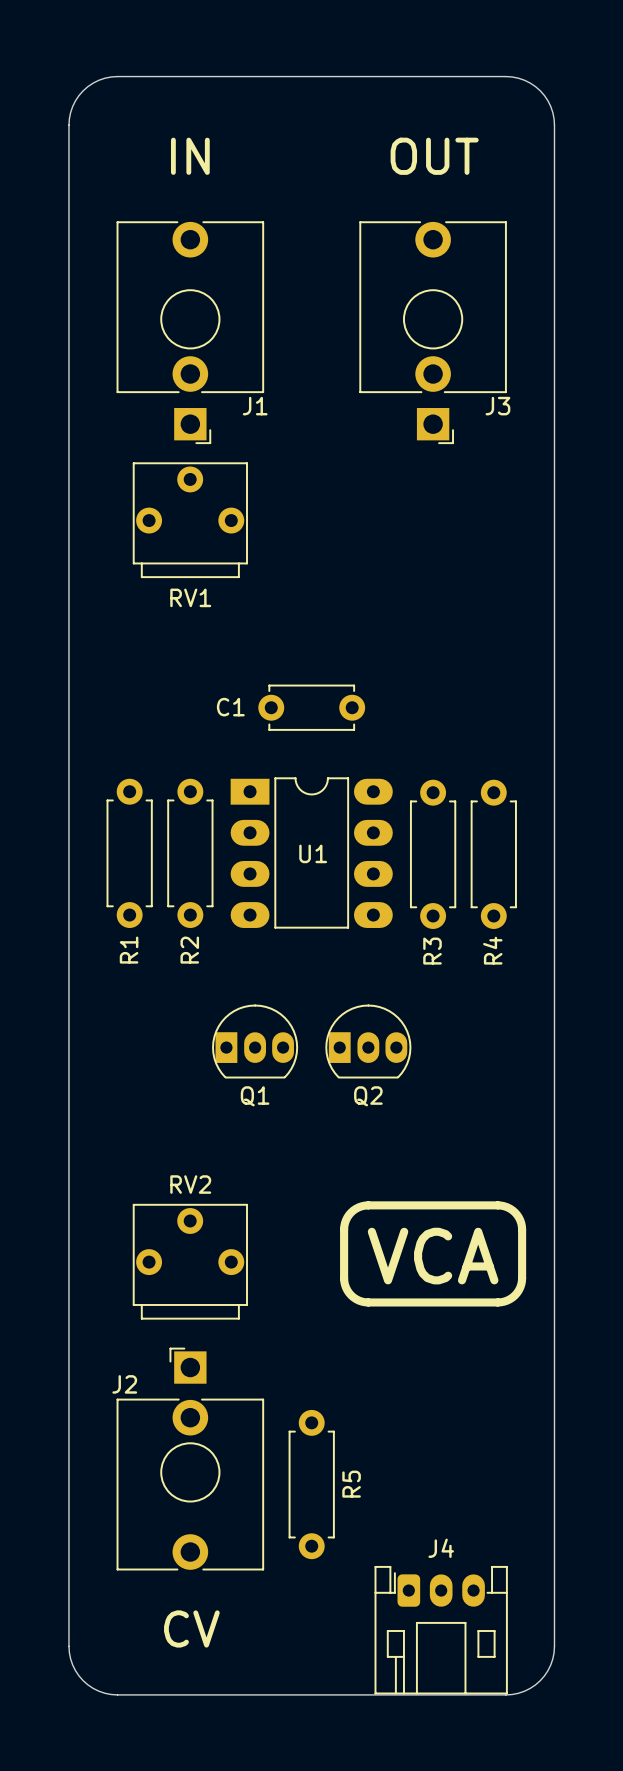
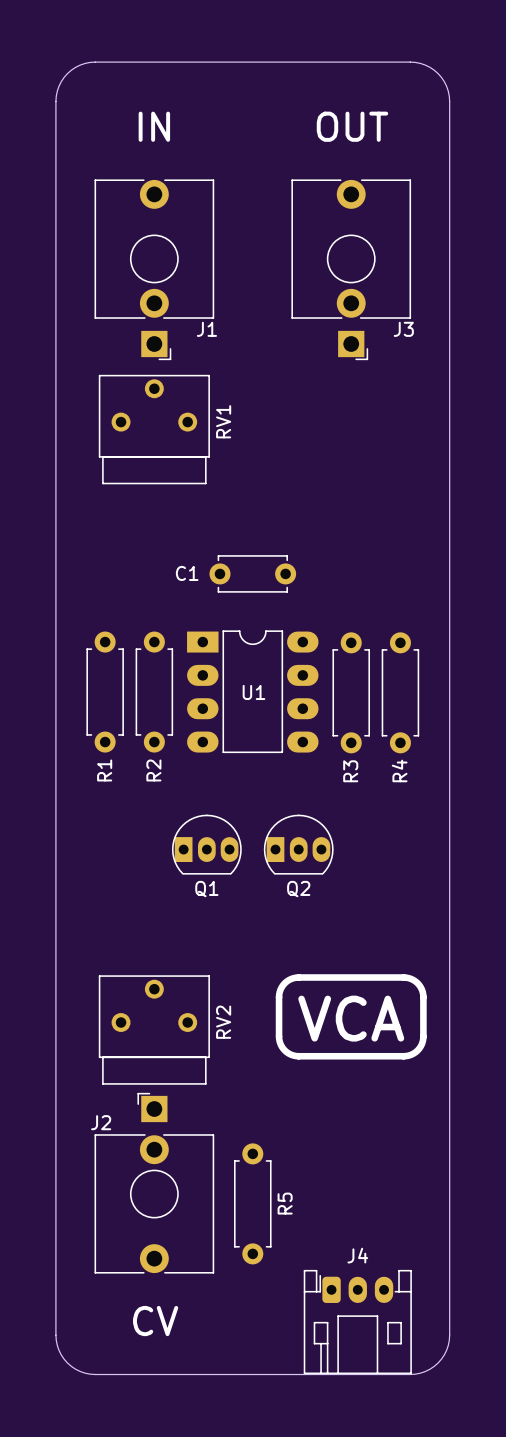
RV1 footprint: [132, 462, 248, 579] -> [98, 374, 210, 485]
RV1 name position: RV1 (190, 597) -> RV1 (223, 421)
RV2 name position: RV2 (190, 1184) -> RV2 (223, 1022)
RV2 footprint: [132, 1203, 248, 1320] -> [98, 975, 210, 1085]

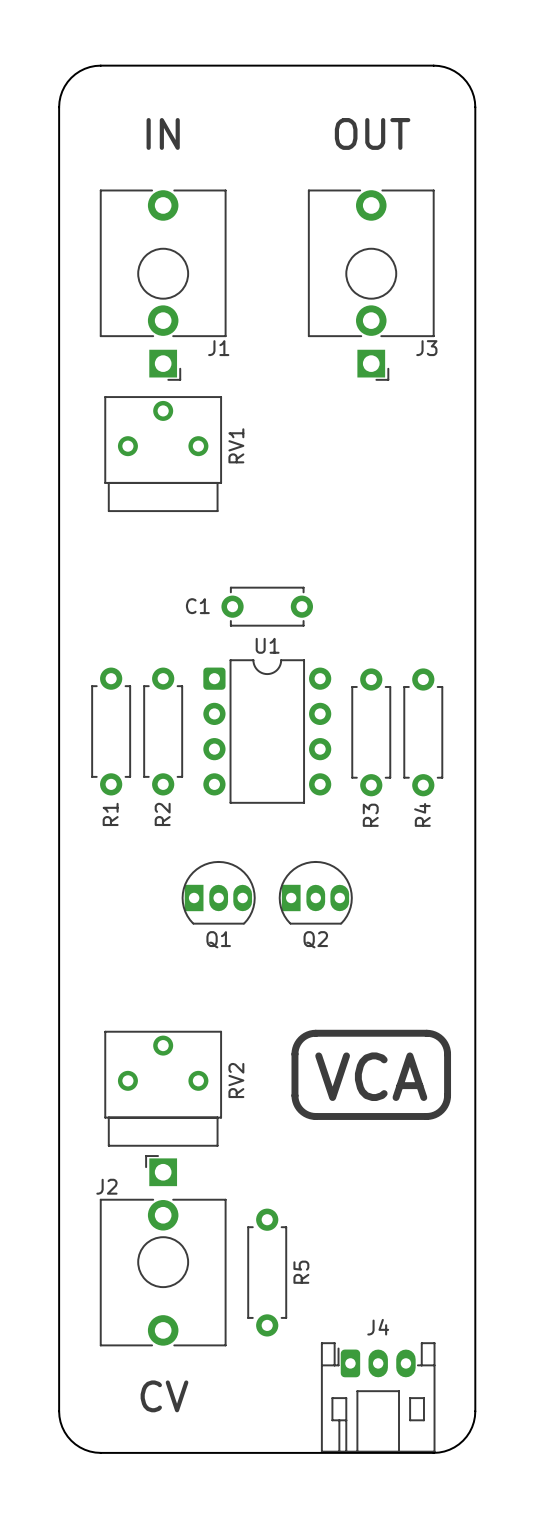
U1 footprint: [187, 630, 319, 754] -> [203, 659, 332, 804]
U1 name position: U1 (253, 692) -> U1 (267, 645)

